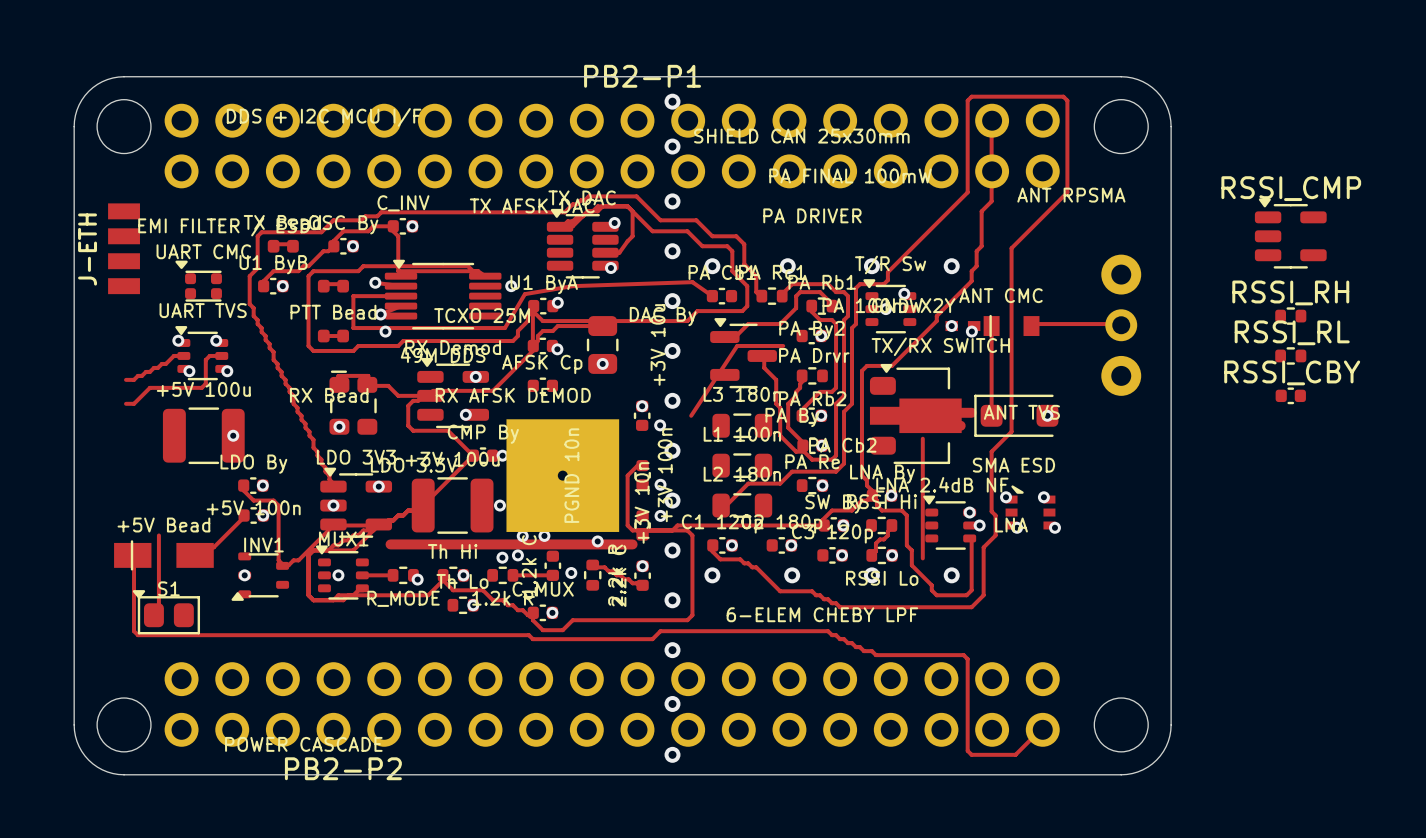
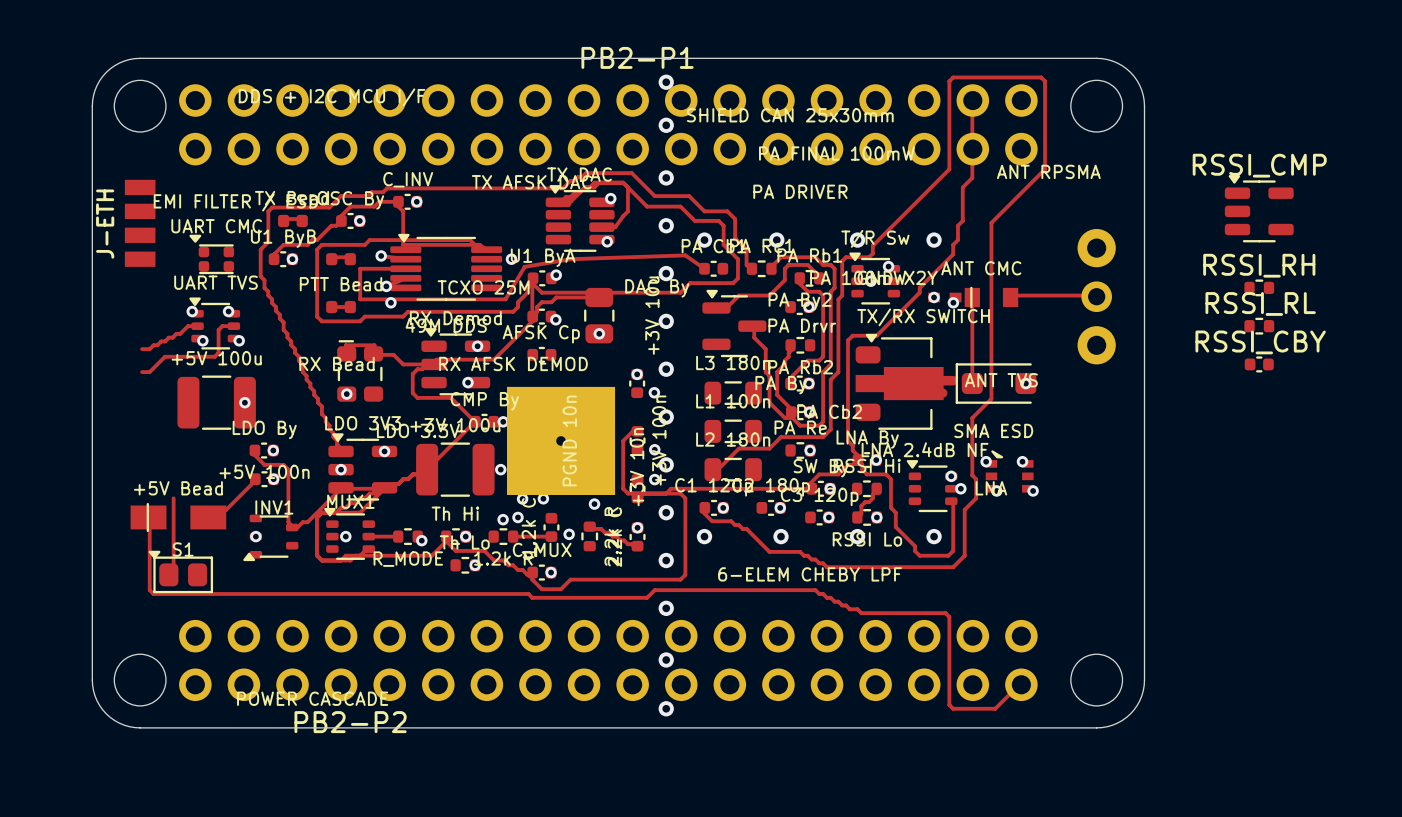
track: (783, 345) (737, 345) (691, 415) -> none
track: (922, 438) (922, 558) -> none
track: (390, 544) (632, 544) -> none

